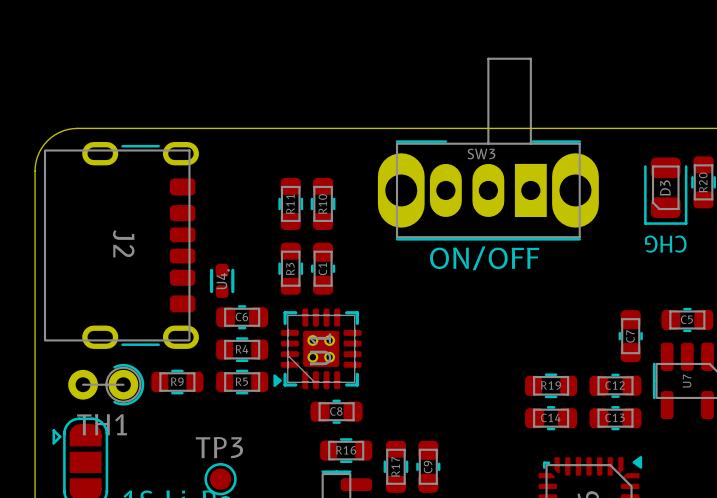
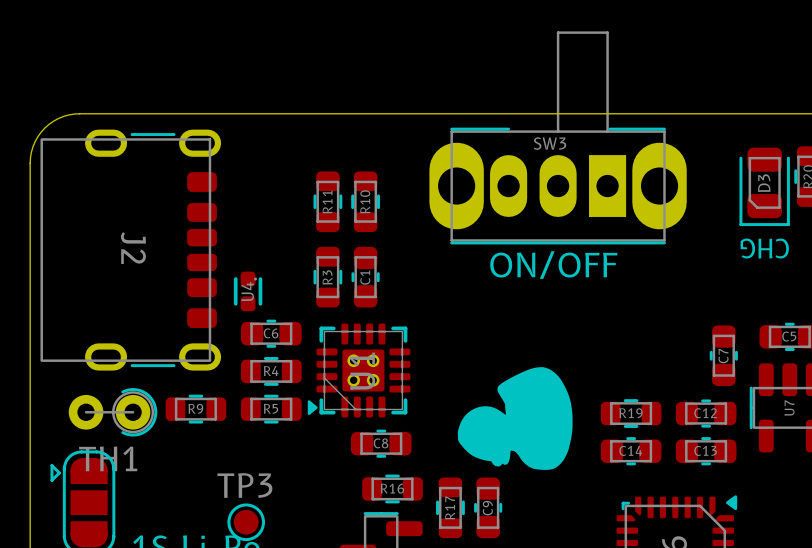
drawing: none -> [457, 367, 573, 470]

